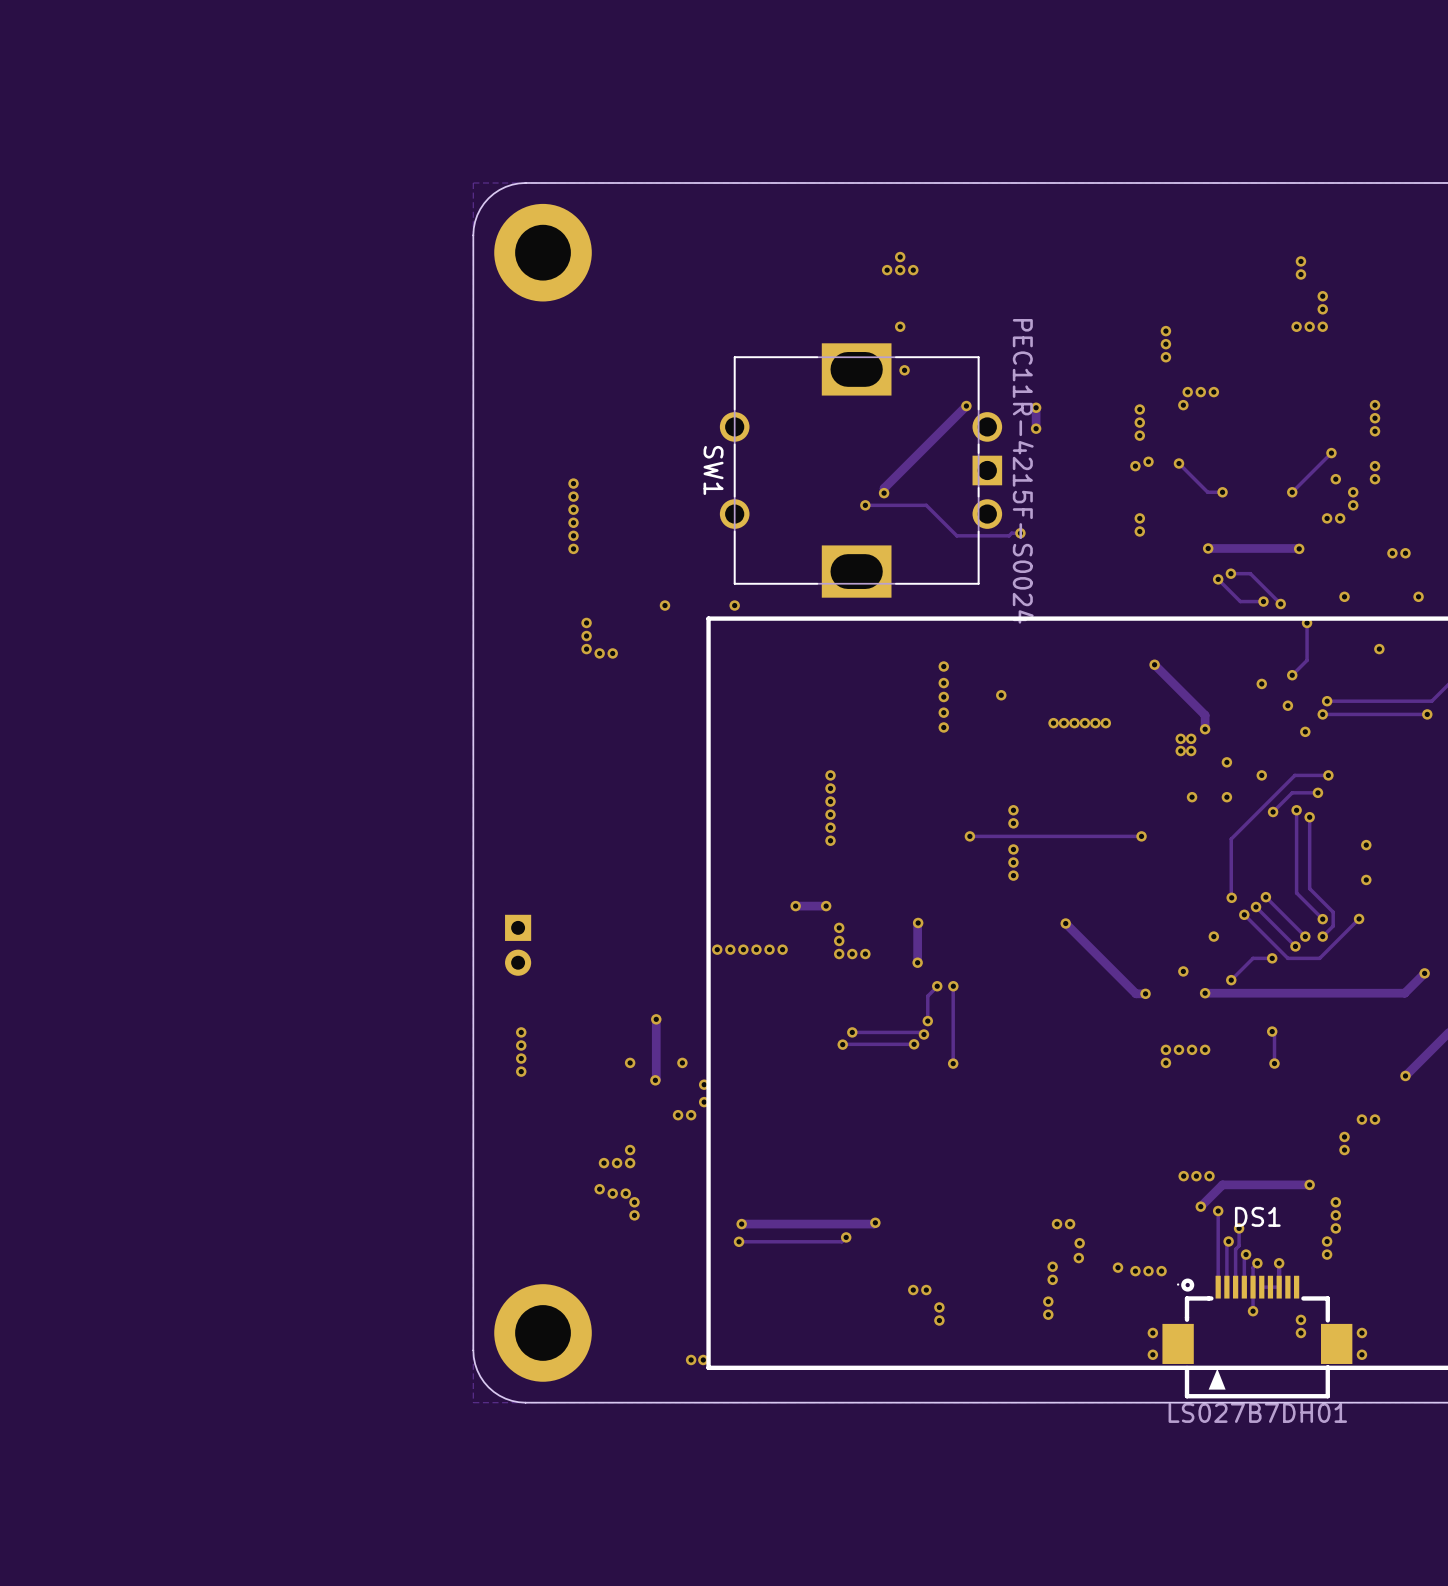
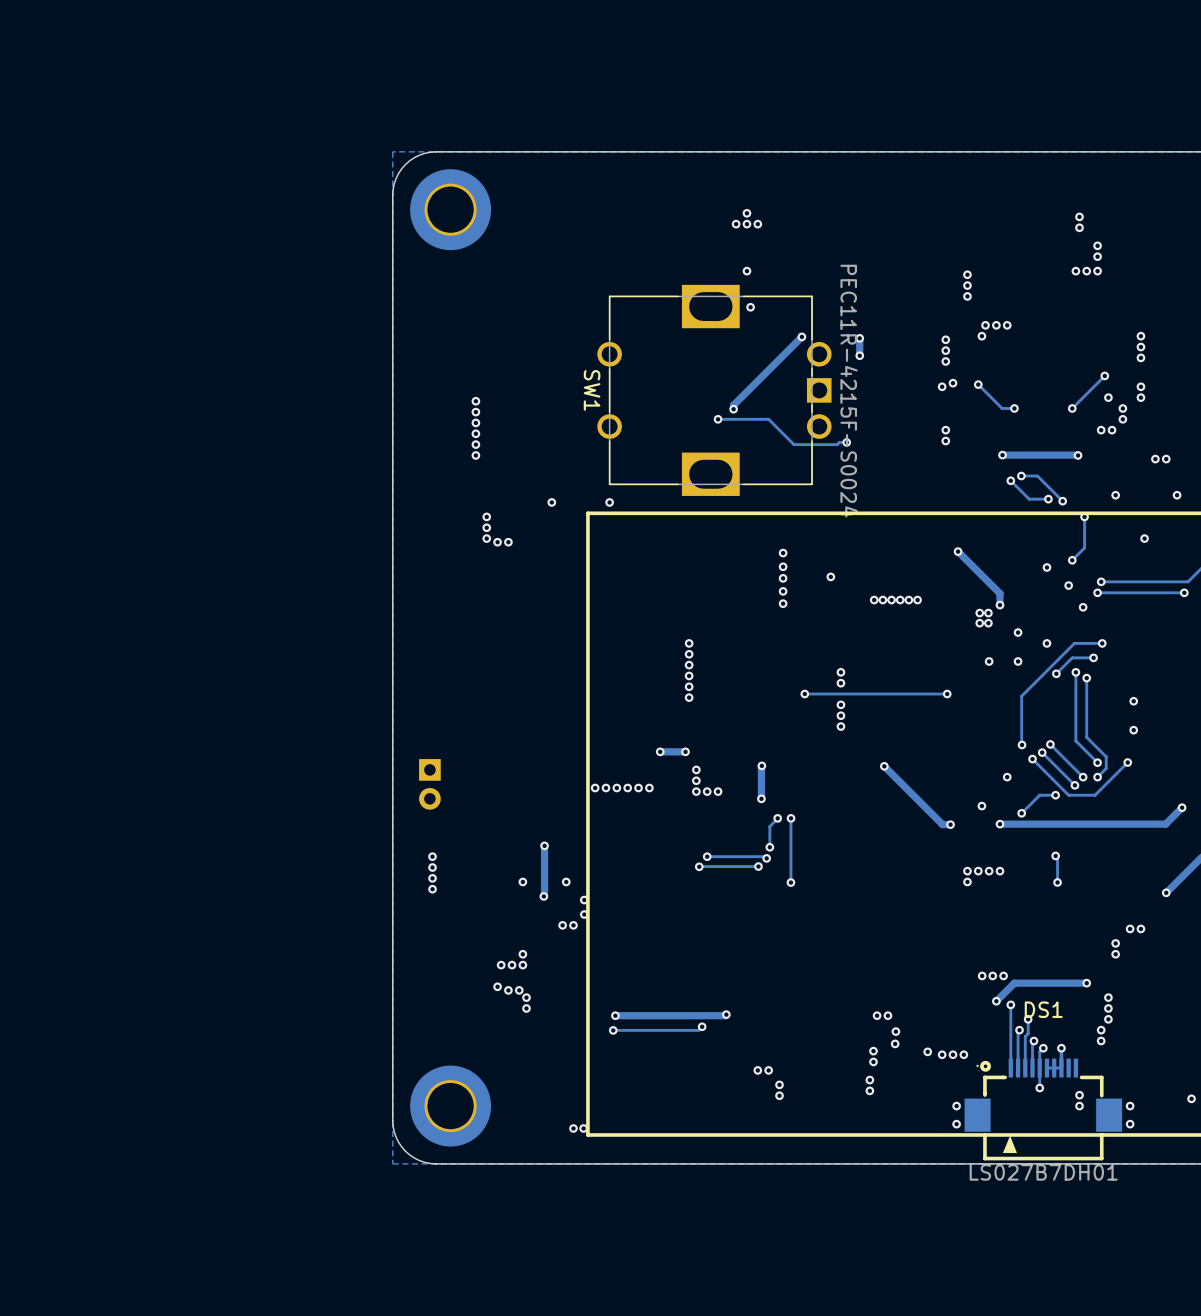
via: none -> (1191, 1098)

